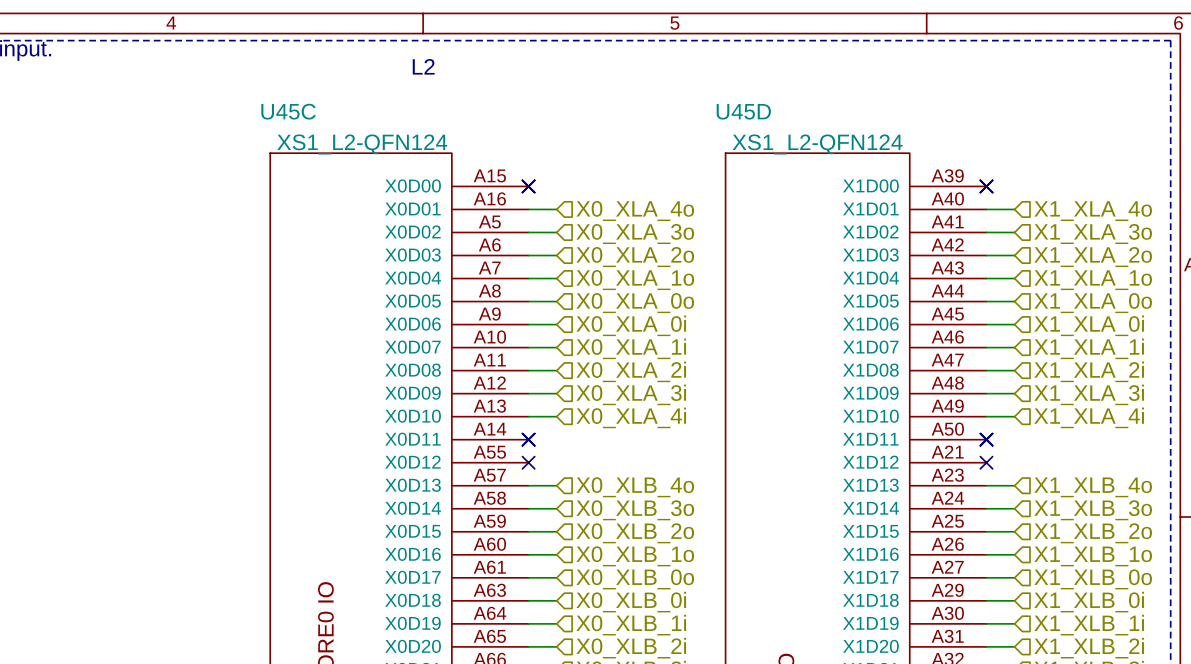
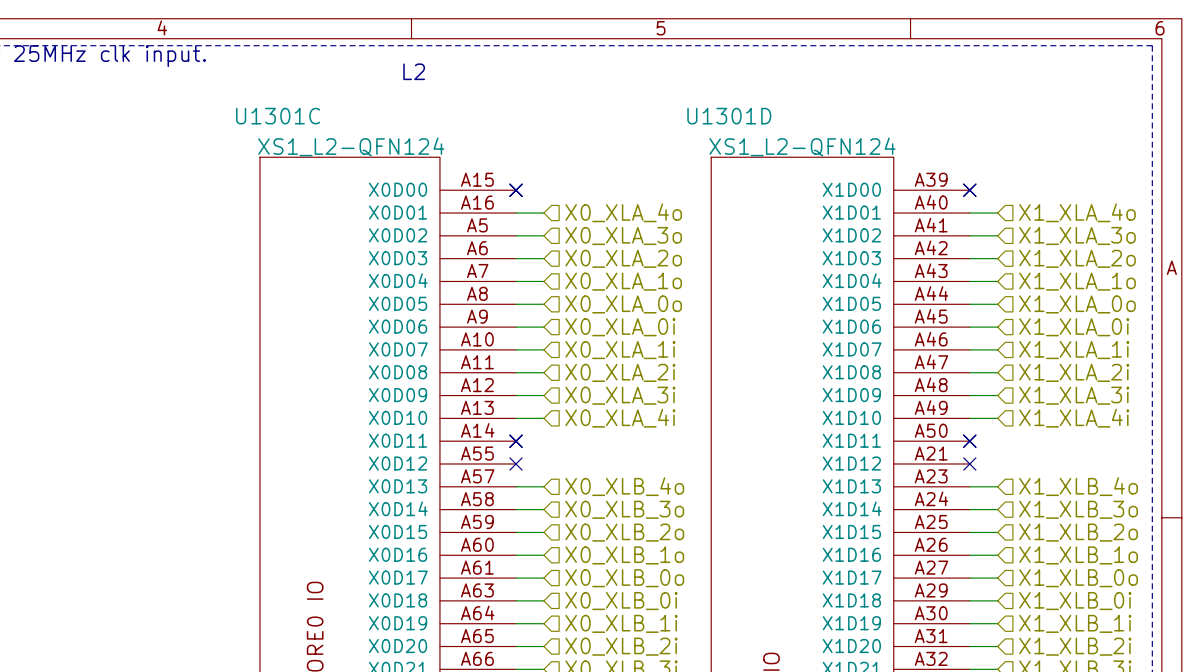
U45C name: U45C (288, 111) -> U1301C (278, 116)
U45D name: U45D (743, 111) -> U1301D (729, 116)

